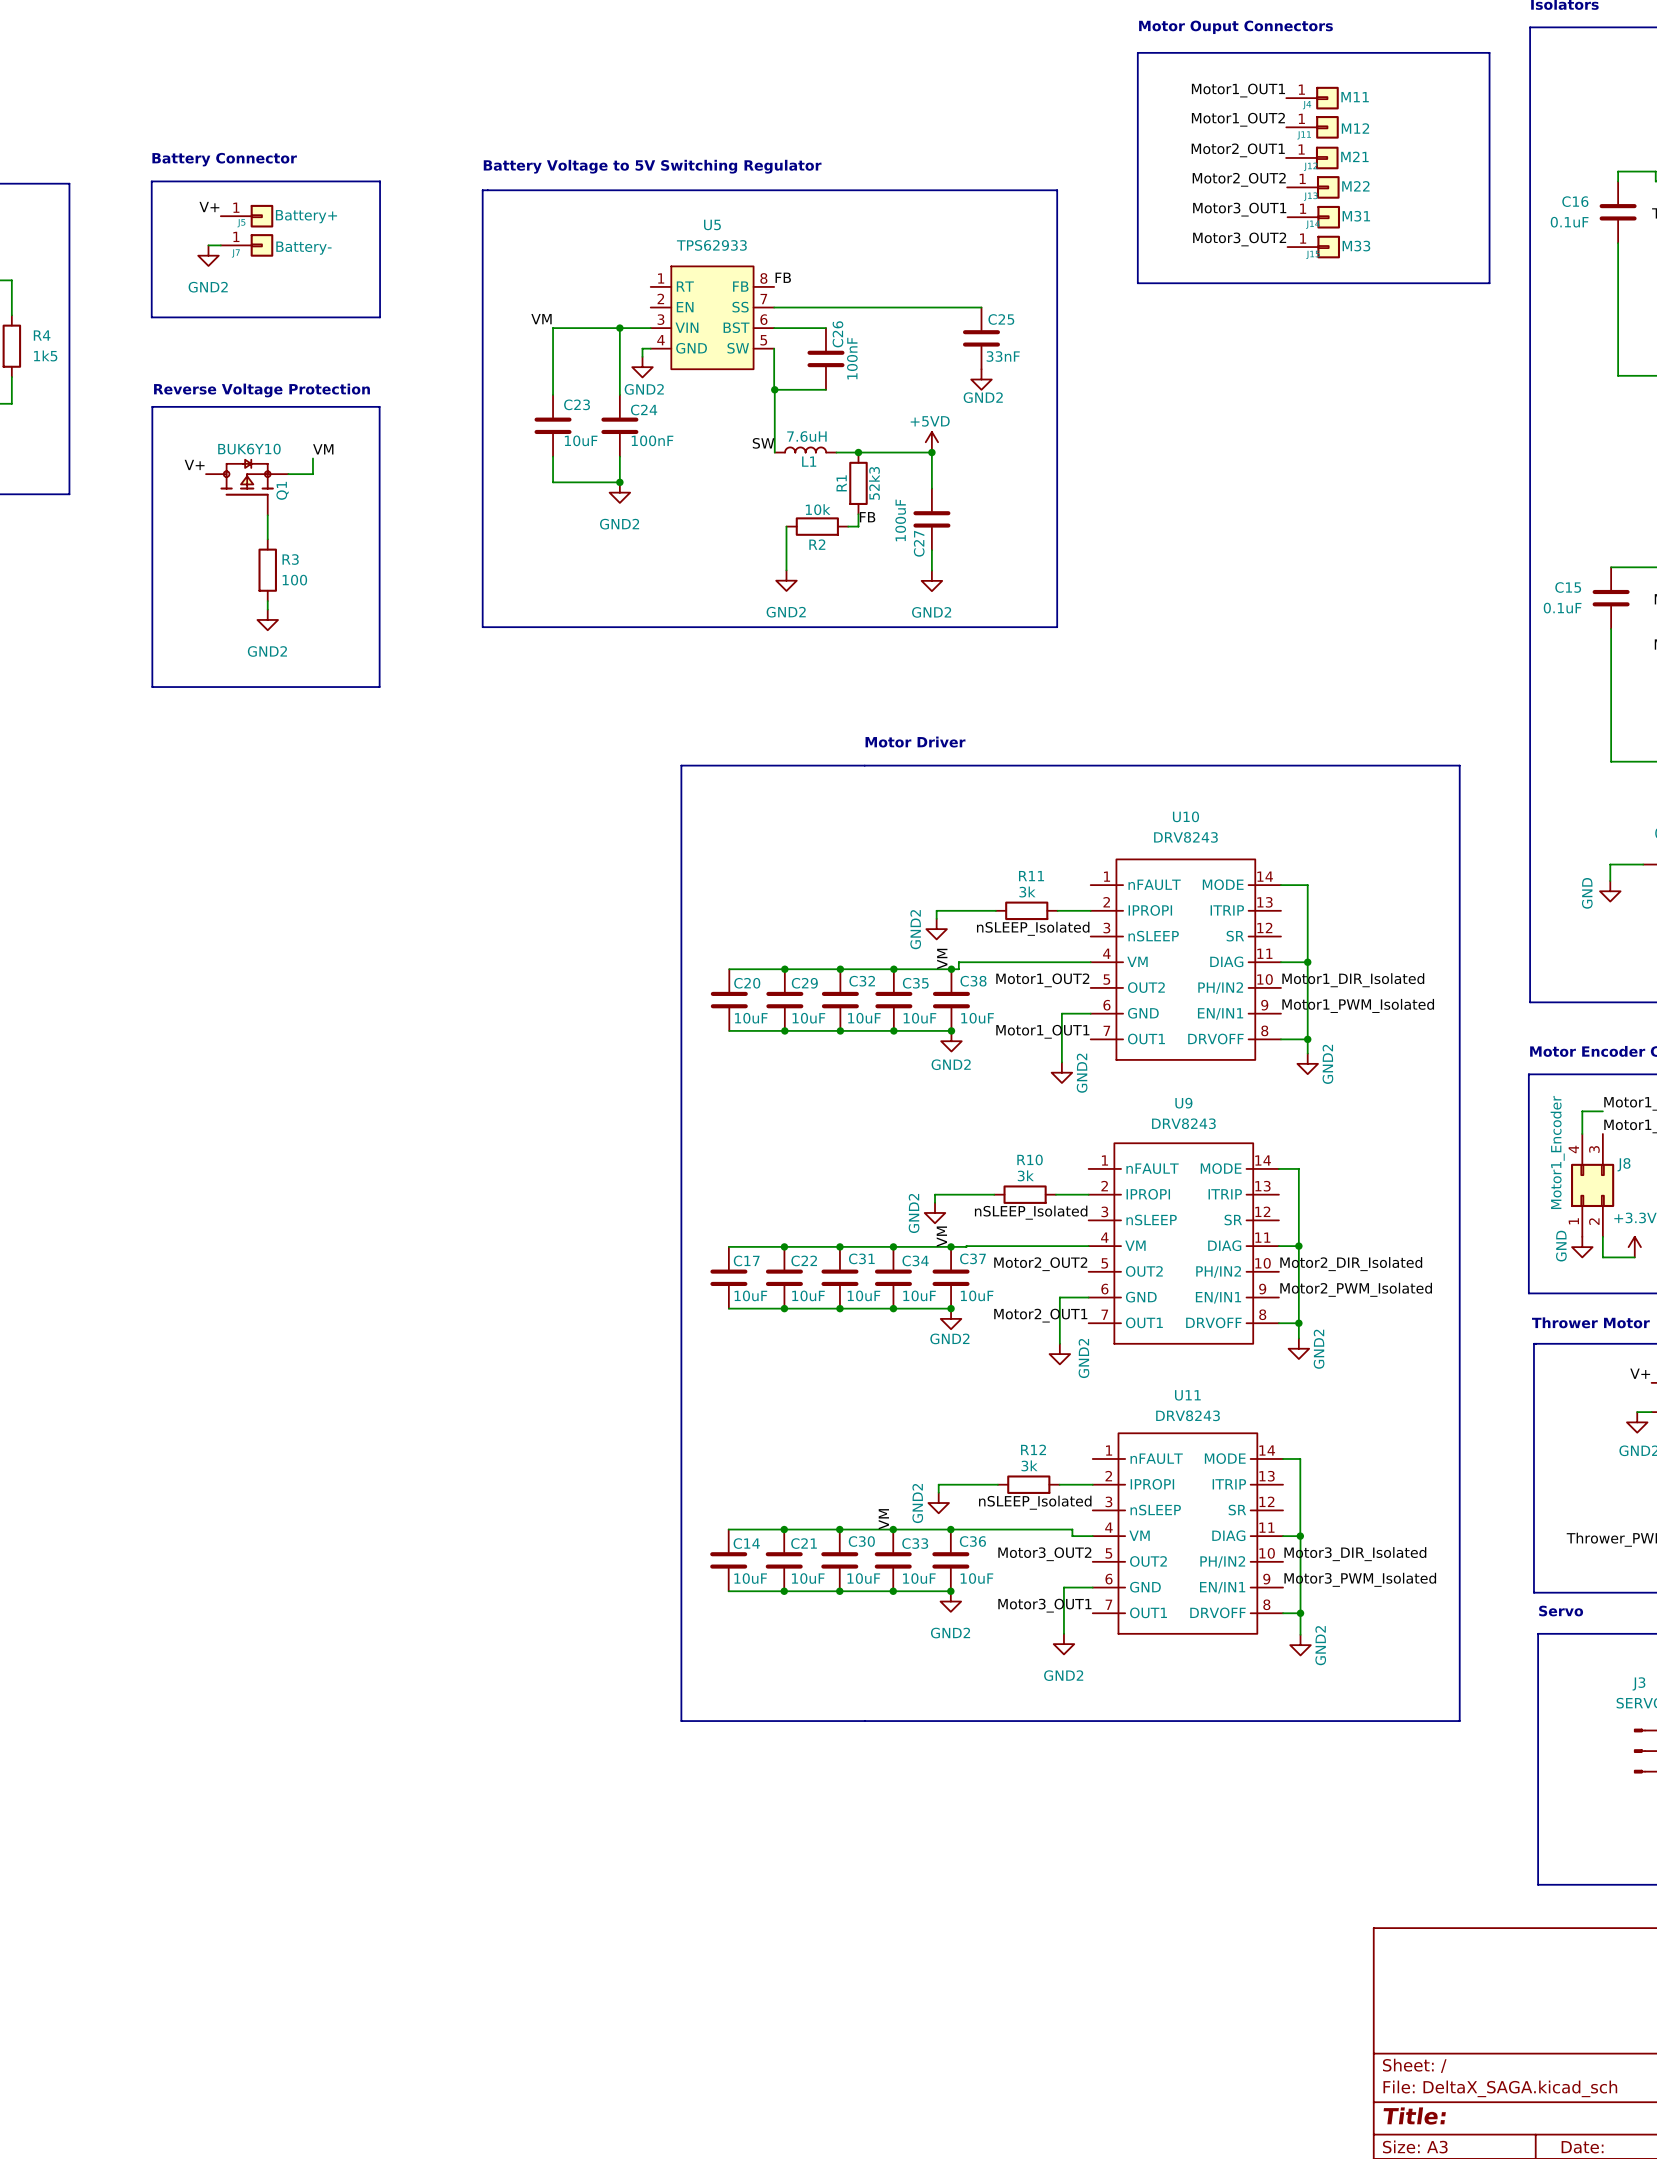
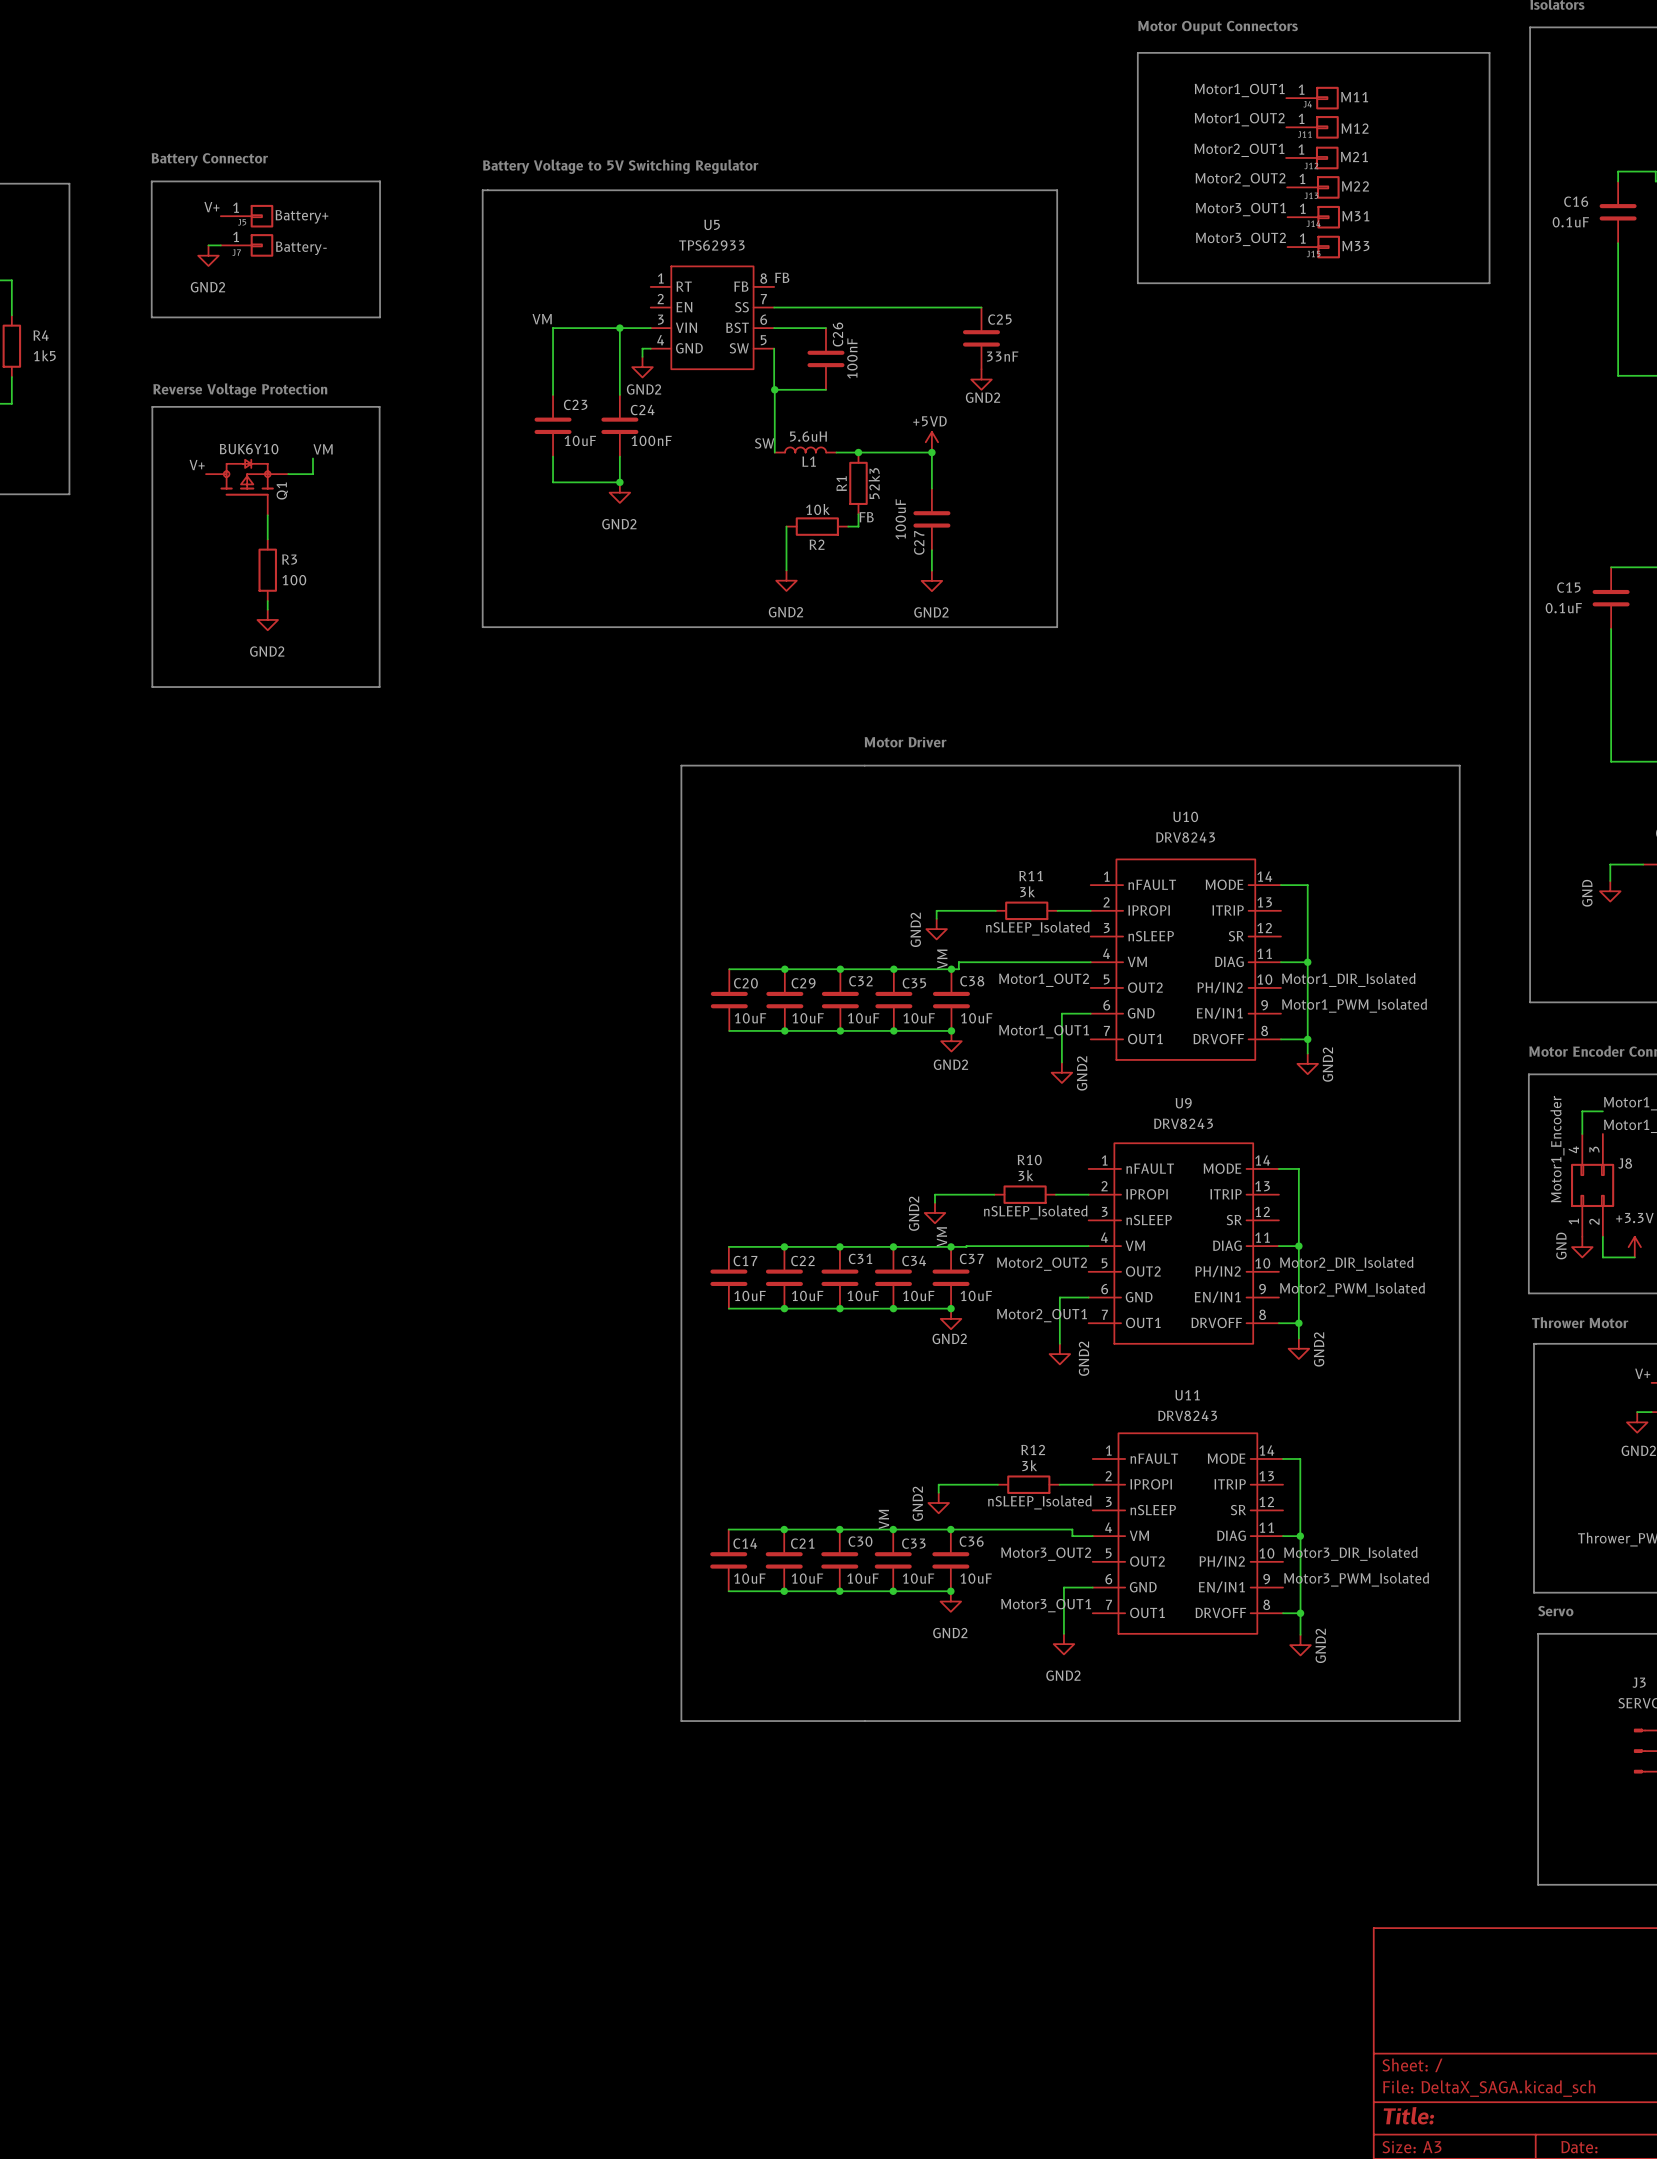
L1 value: 7.6uH (806, 436) -> 5.6uH (808, 436)

